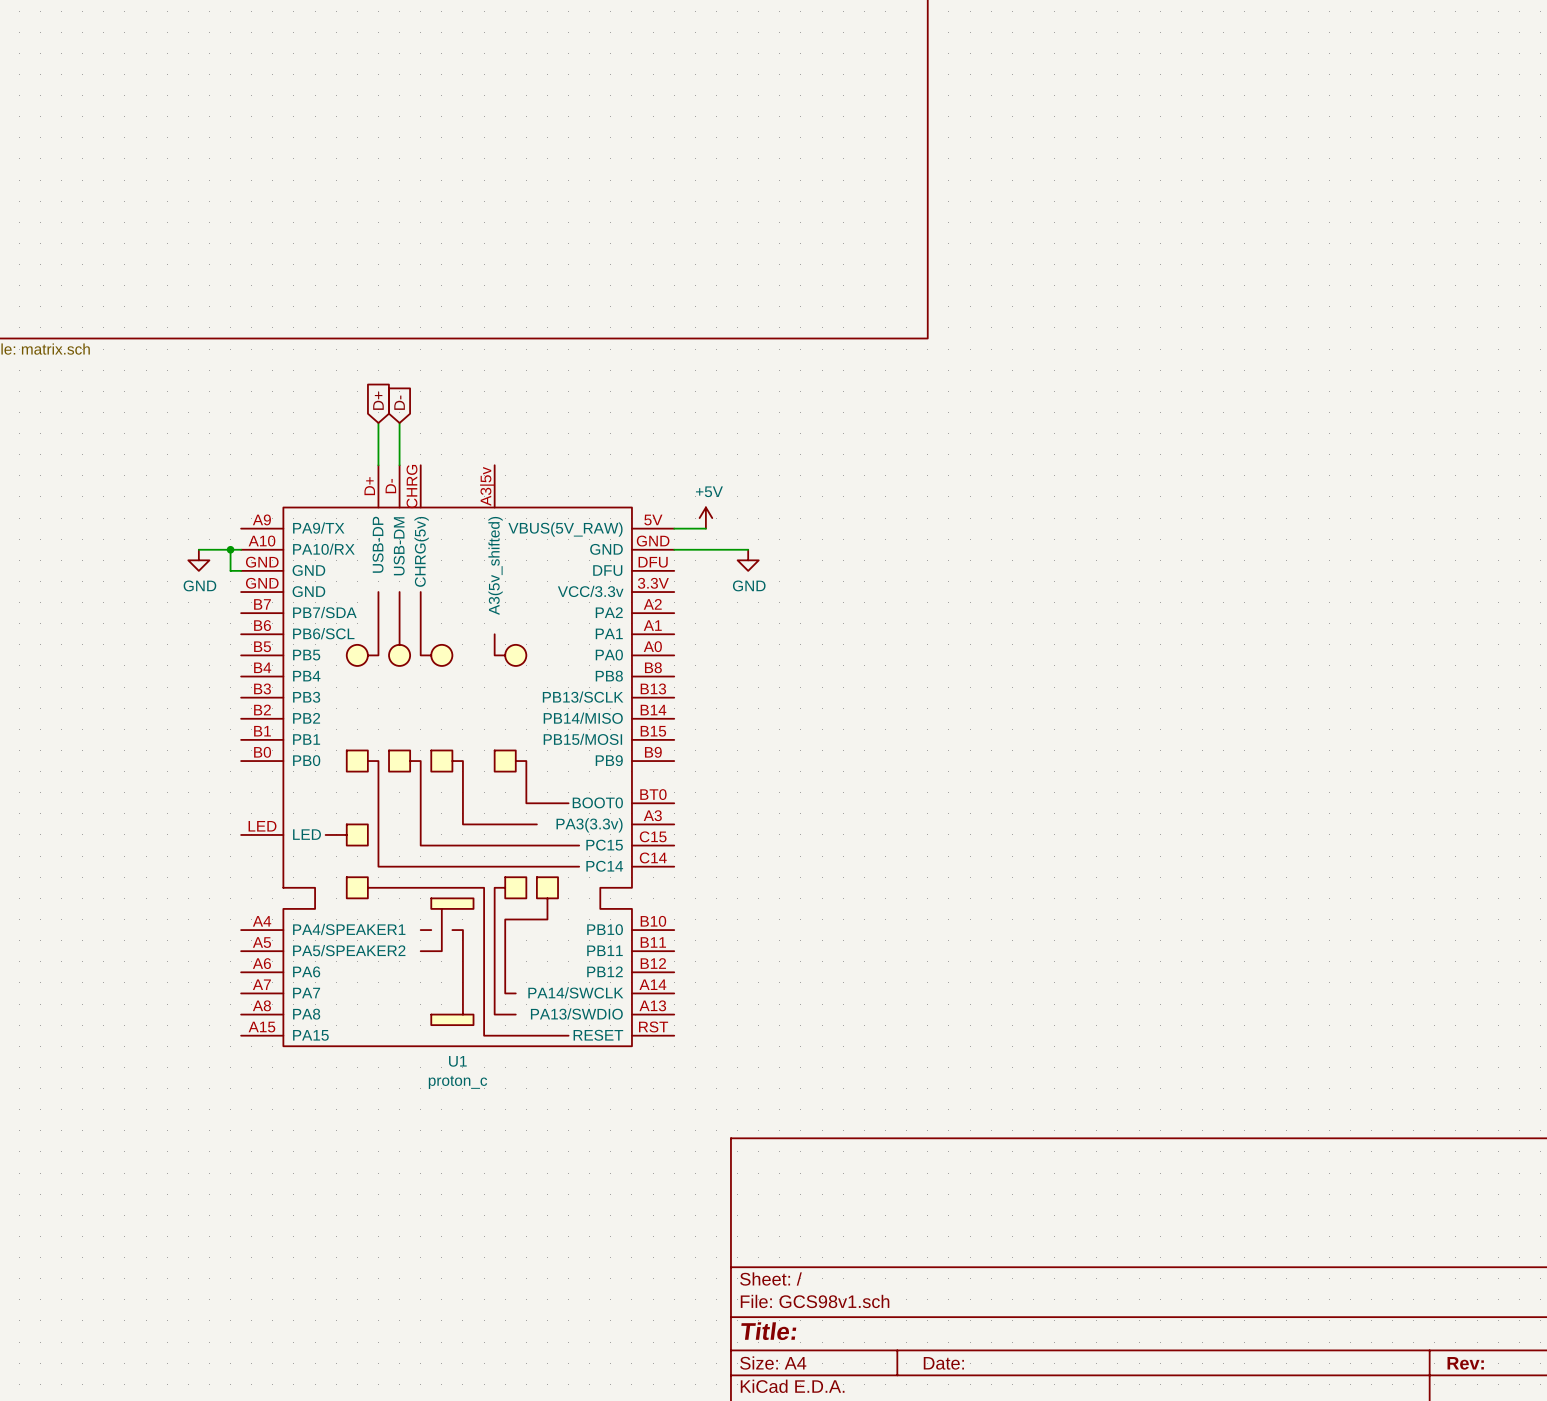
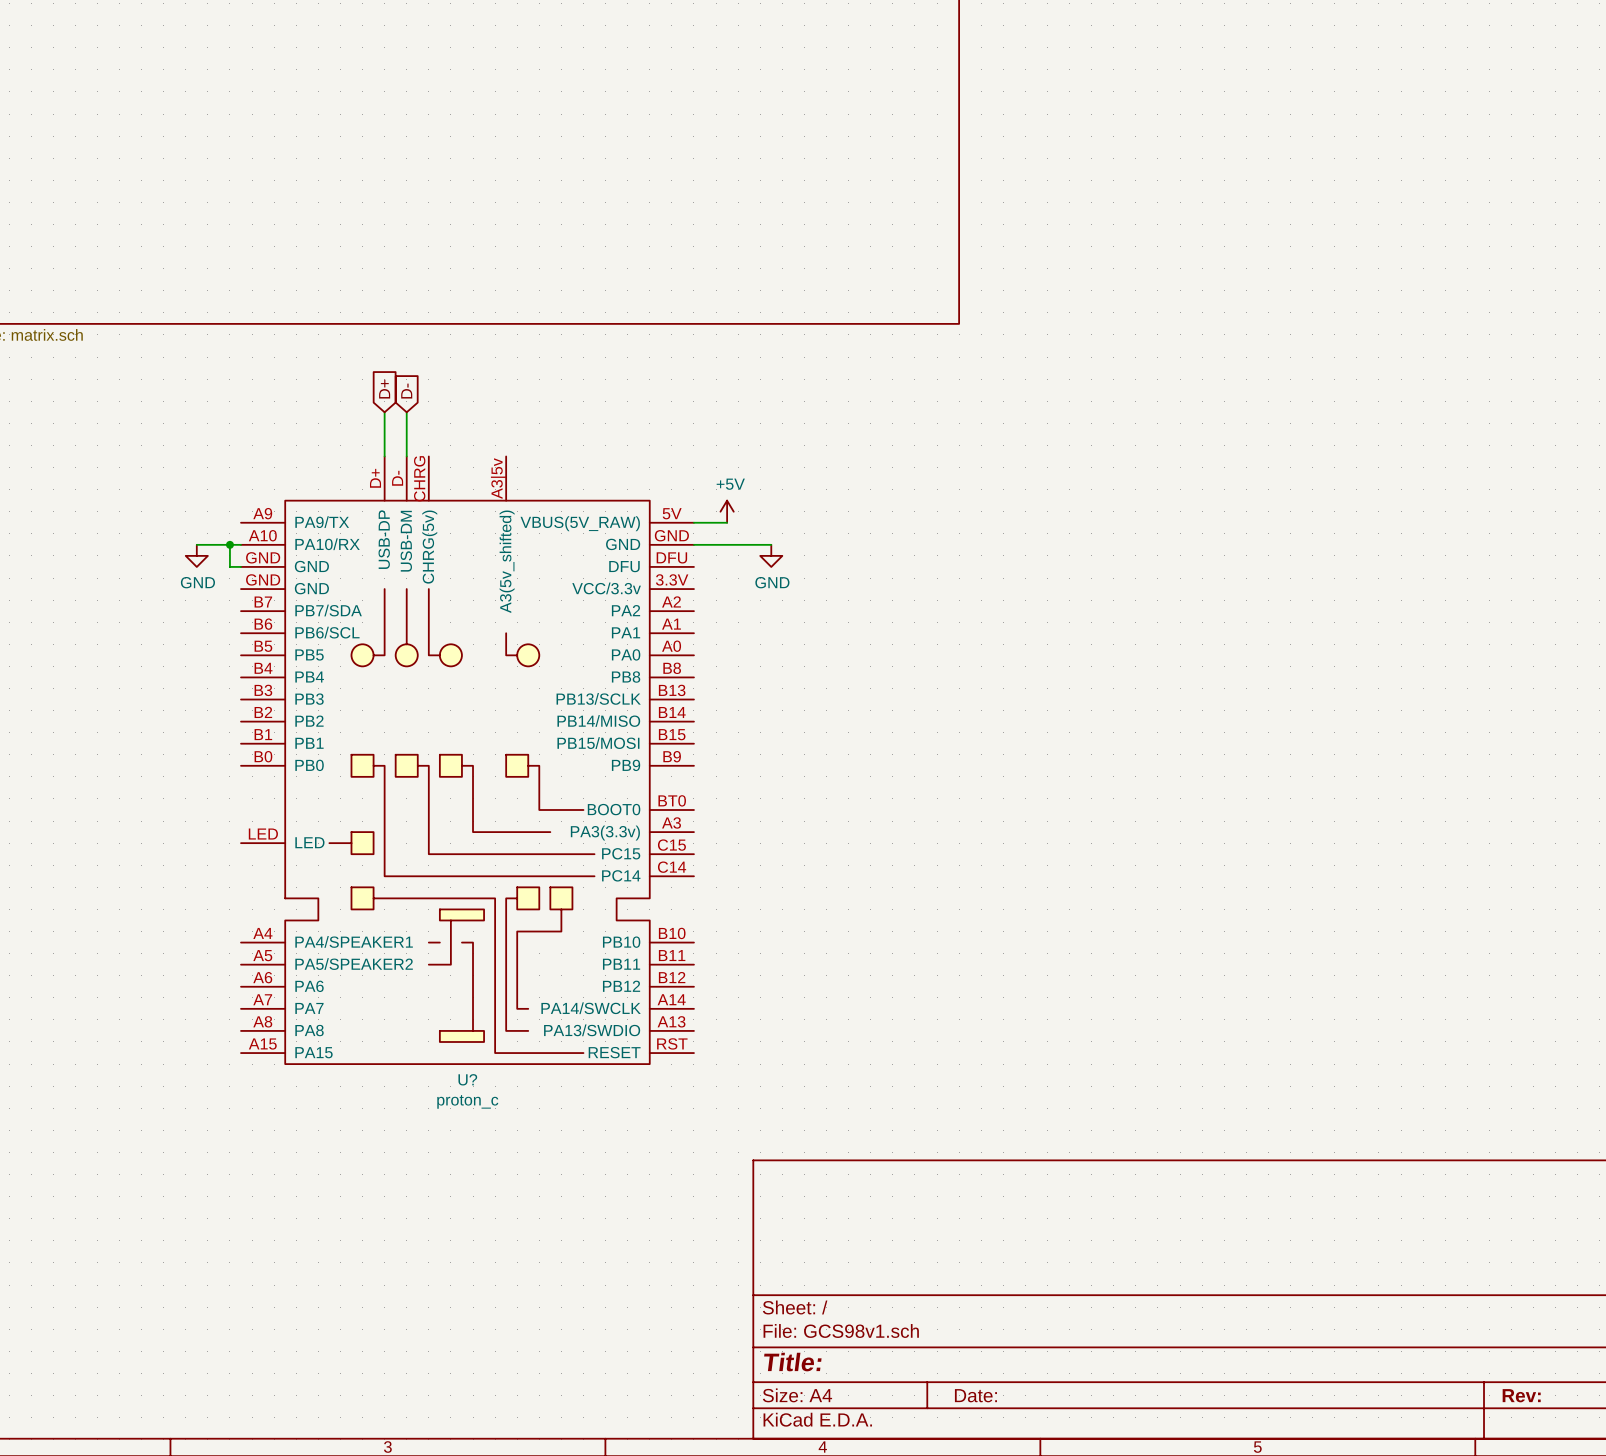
U1 name: U1 (457, 1061) -> U? (467, 1079)

